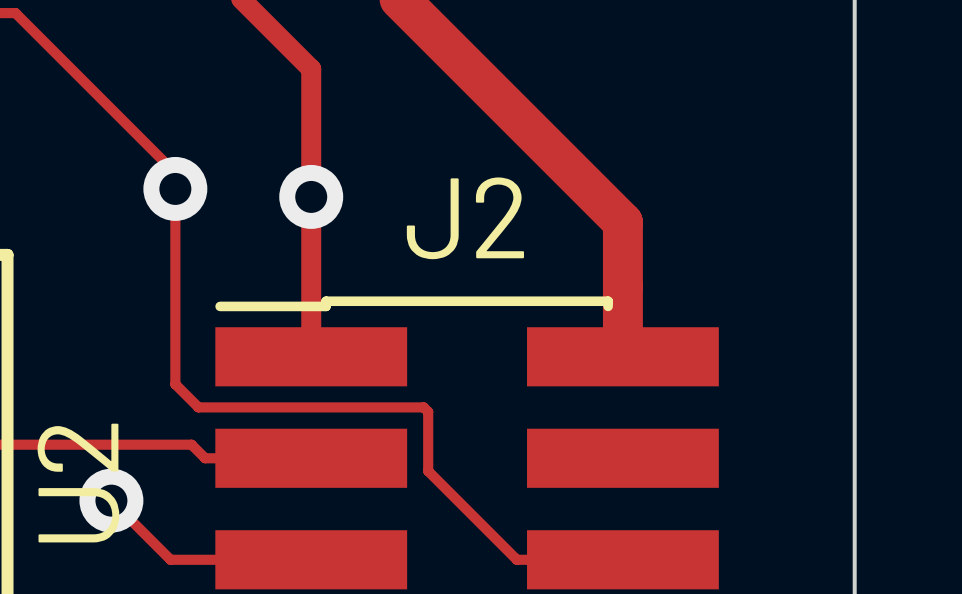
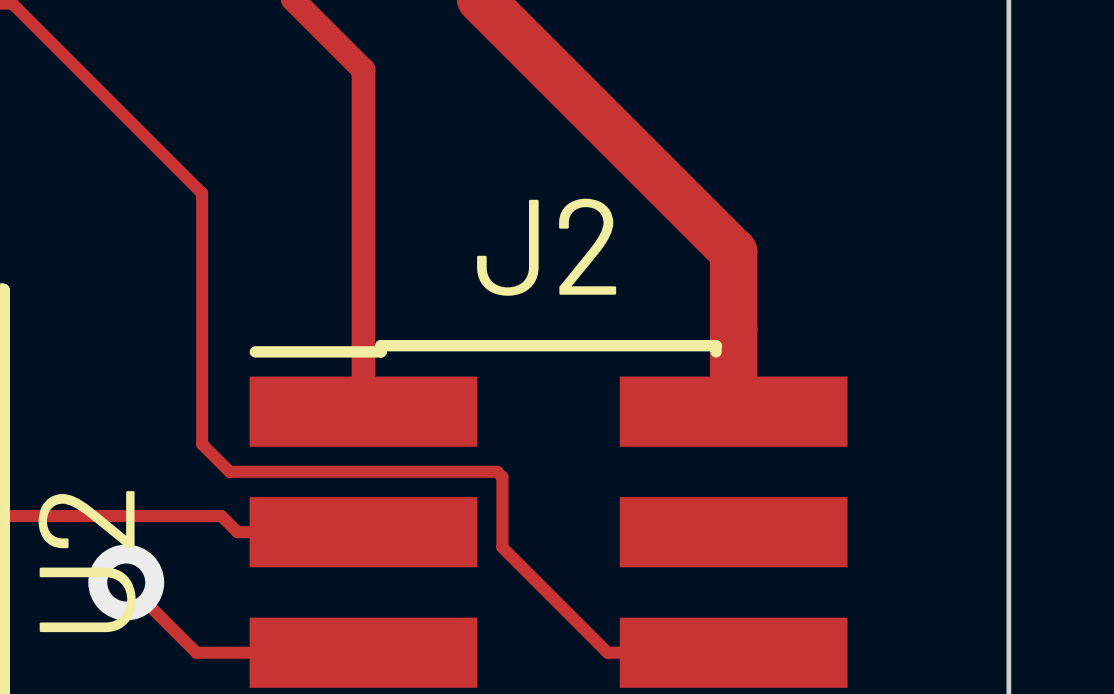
via: (175, 188) -> none
via: (311, 196) -> none

